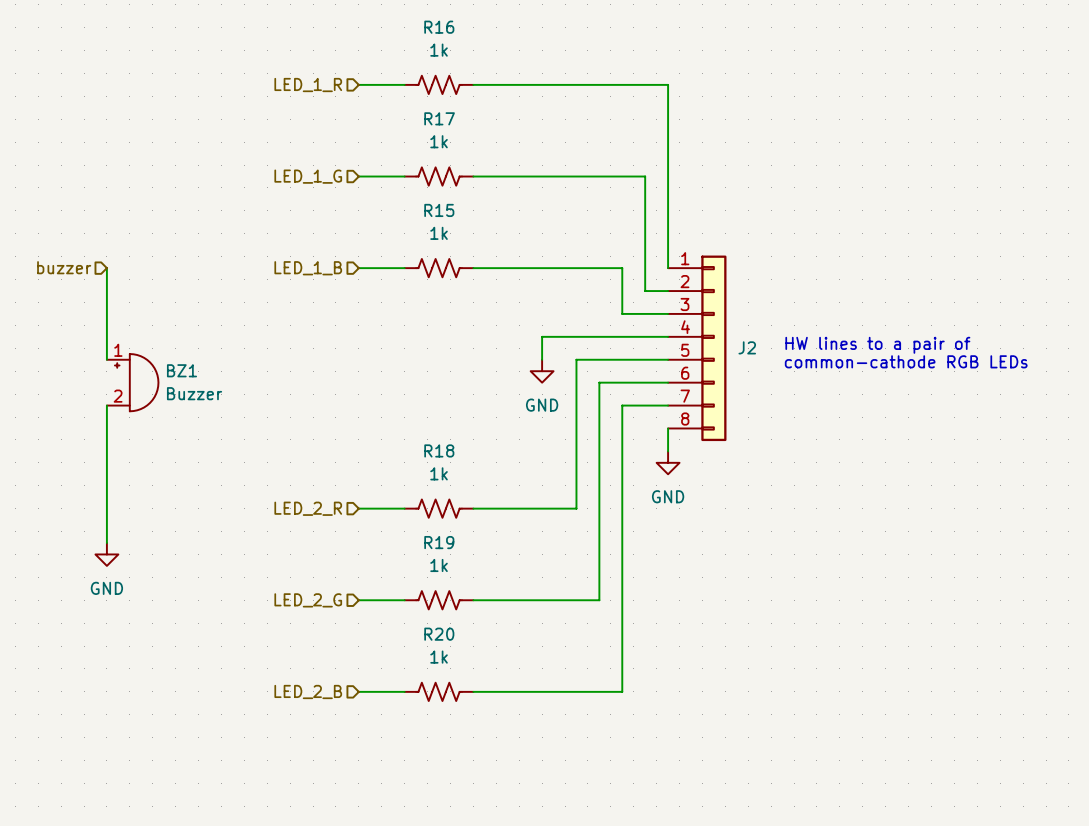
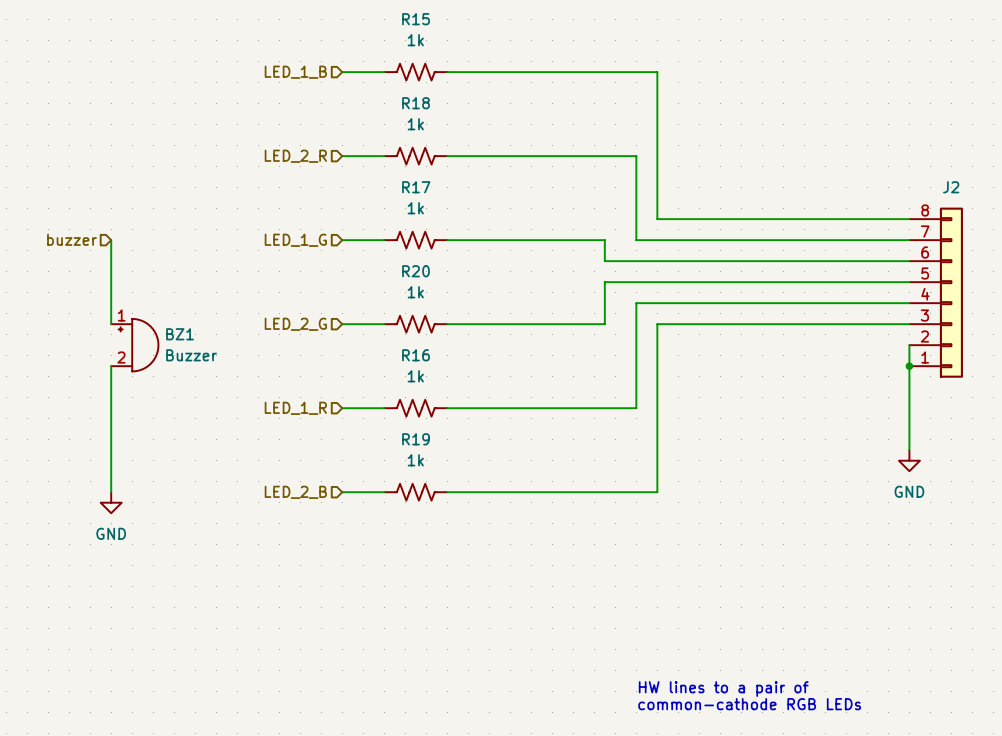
R16 name: R16 (439, 27) -> R15 (416, 19)
wire: (668, 84) (668, 268) -> (625, 72) (657, 72) (657, 219) (909, 219)
hierarchical label: LED_1_R (308, 85) -> LED_1_B (295, 72)
R17 name: R17 (439, 118) -> R18 (416, 103)
hierarchical label: LED_1_G (308, 176) -> LED_2_R (295, 156)
wire: (645, 176) (645, 268) -> (604, 156) (636, 156) (636, 240) (909, 240)
R15 name: R15 (439, 210) -> R17 (416, 187)
hierarchical label: LED_1_B (308, 268) -> LED_1_G (295, 240)
wire: (622, 268) (622, 313) (645, 313) -> (583, 240) (604, 240)
wire: none -> (625, 261) (909, 261)
wire: none -> (625, 282) (909, 282)
wire: (668, 336) (542, 336) (542, 359) -> none
wire: none -> (909, 303) (636, 303) (636, 408) (447, 408)
text: HW lines to a pair of (877, 345) -> none
J2 name position: J2 (747, 347) -> J2 (951, 187)
J2 position: (697, 348) -> (936, 292)
J2 flip: as is (713, 348) -> up-down (951, 292)
hierarchical label: none -> LED_2_G (295, 324)
wire: (576, 359) (576, 508) (473, 508) -> (541, 324) (447, 324)
wire: (645, 359) (668, 359) -> (604, 324) (604, 282)
wire: none -> (909, 324) (657, 324) (657, 492) (447, 492)
text: common-cathode RGB LEDs (906, 361) -> none
power symbol: GND (542, 371) -> none
wire: (668, 382) (599, 382) (599, 600) (473, 600) -> none
wire: none -> (909, 345) (909, 450)
wire: (668, 405) (622, 405) (622, 691) (473, 691) -> none
junction: none -> (909, 366)
wire: (668, 428) (668, 451) -> none
hierarchical label: none -> LED_1_R (295, 408)
R16: none -> 1k (415, 408)
power symbol: GND (668, 462) -> none
hierarchical label: LED_2_R (308, 508) -> none
wire: (358, 508) (404, 508) -> (342, 324) (384, 324)
R18: 1k (439, 508) -> none
power symbol: none -> GND (909, 460)
hierarchical label: LED_2_G (308, 600) -> none
wire: (358, 600) (404, 600) -> (342, 408) (384, 408)
R19 position: (439, 600) -> (415, 492)
hierarchical label position: LED_2_B (308, 691) -> LED_2_B (295, 492)
wire: (358, 691) (404, 691) -> (342, 492) (384, 492)
R20 position: (439, 691) -> (415, 324)
text: none -> HW lines to a pair of (723, 689)
text: none -> common-cathode RGB LEDs (749, 704)

